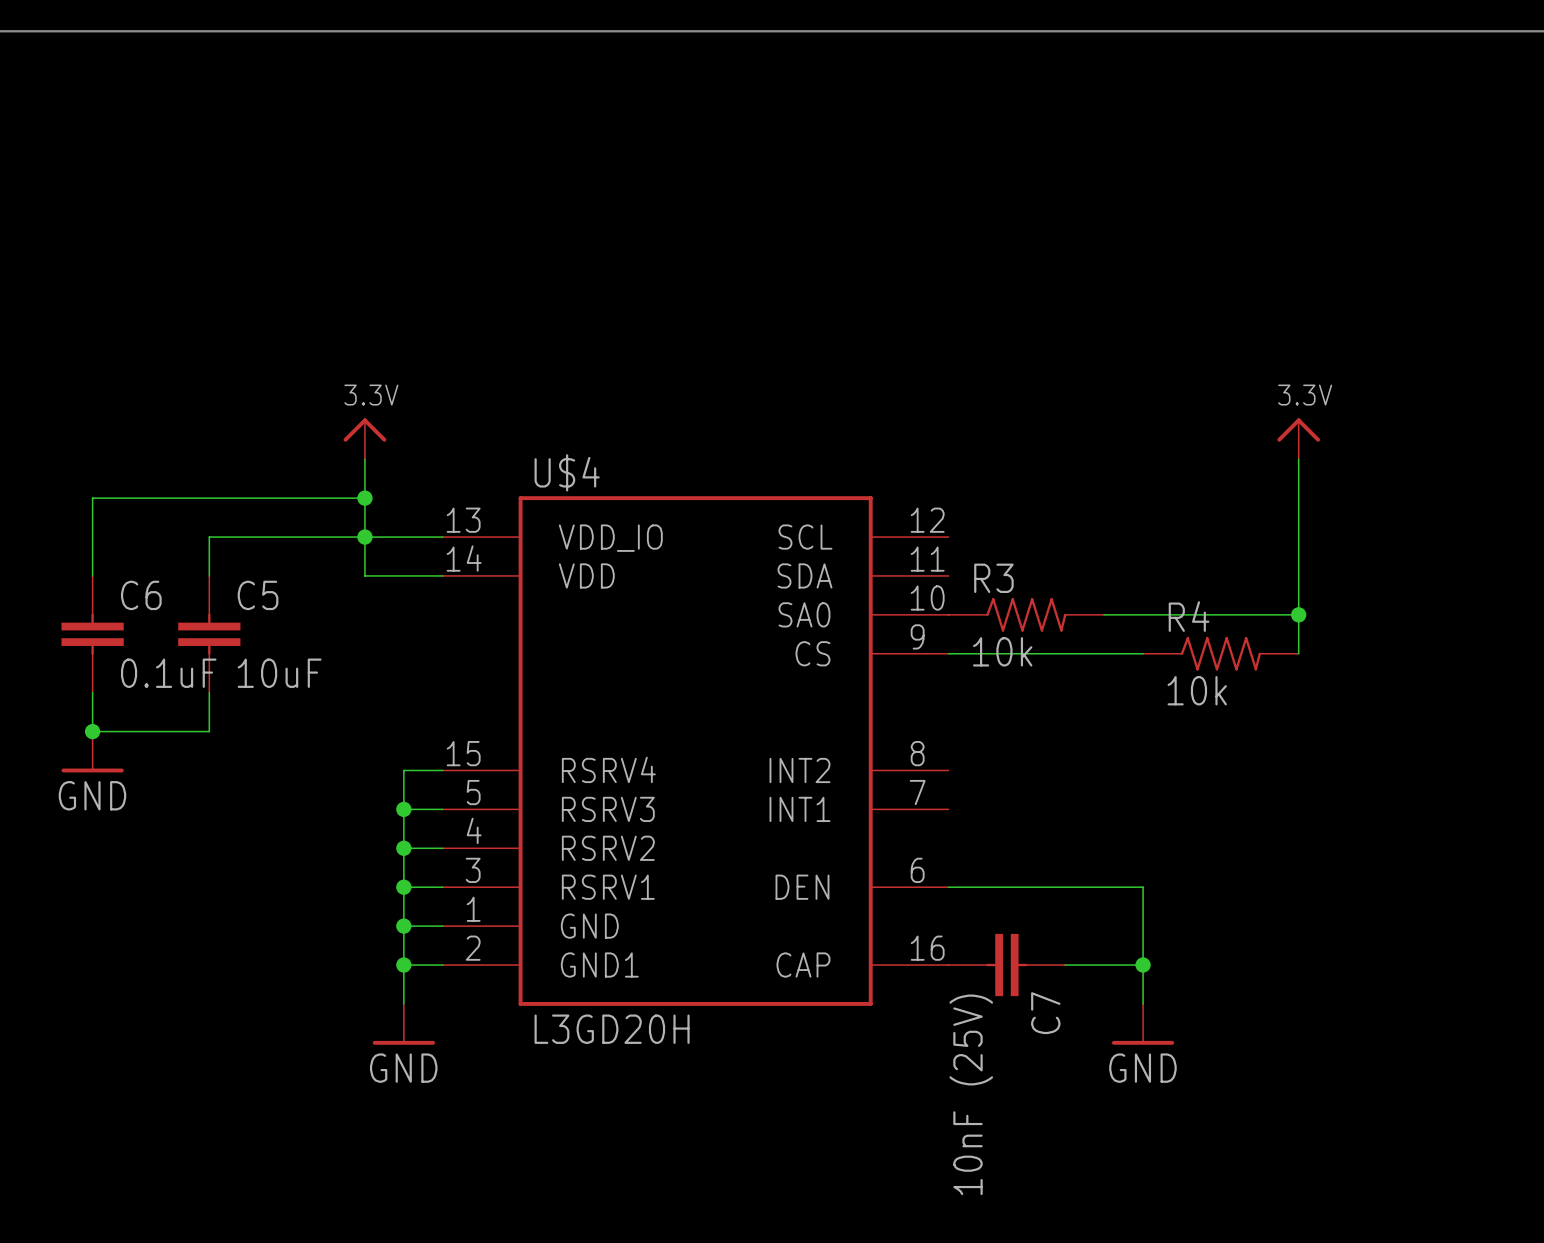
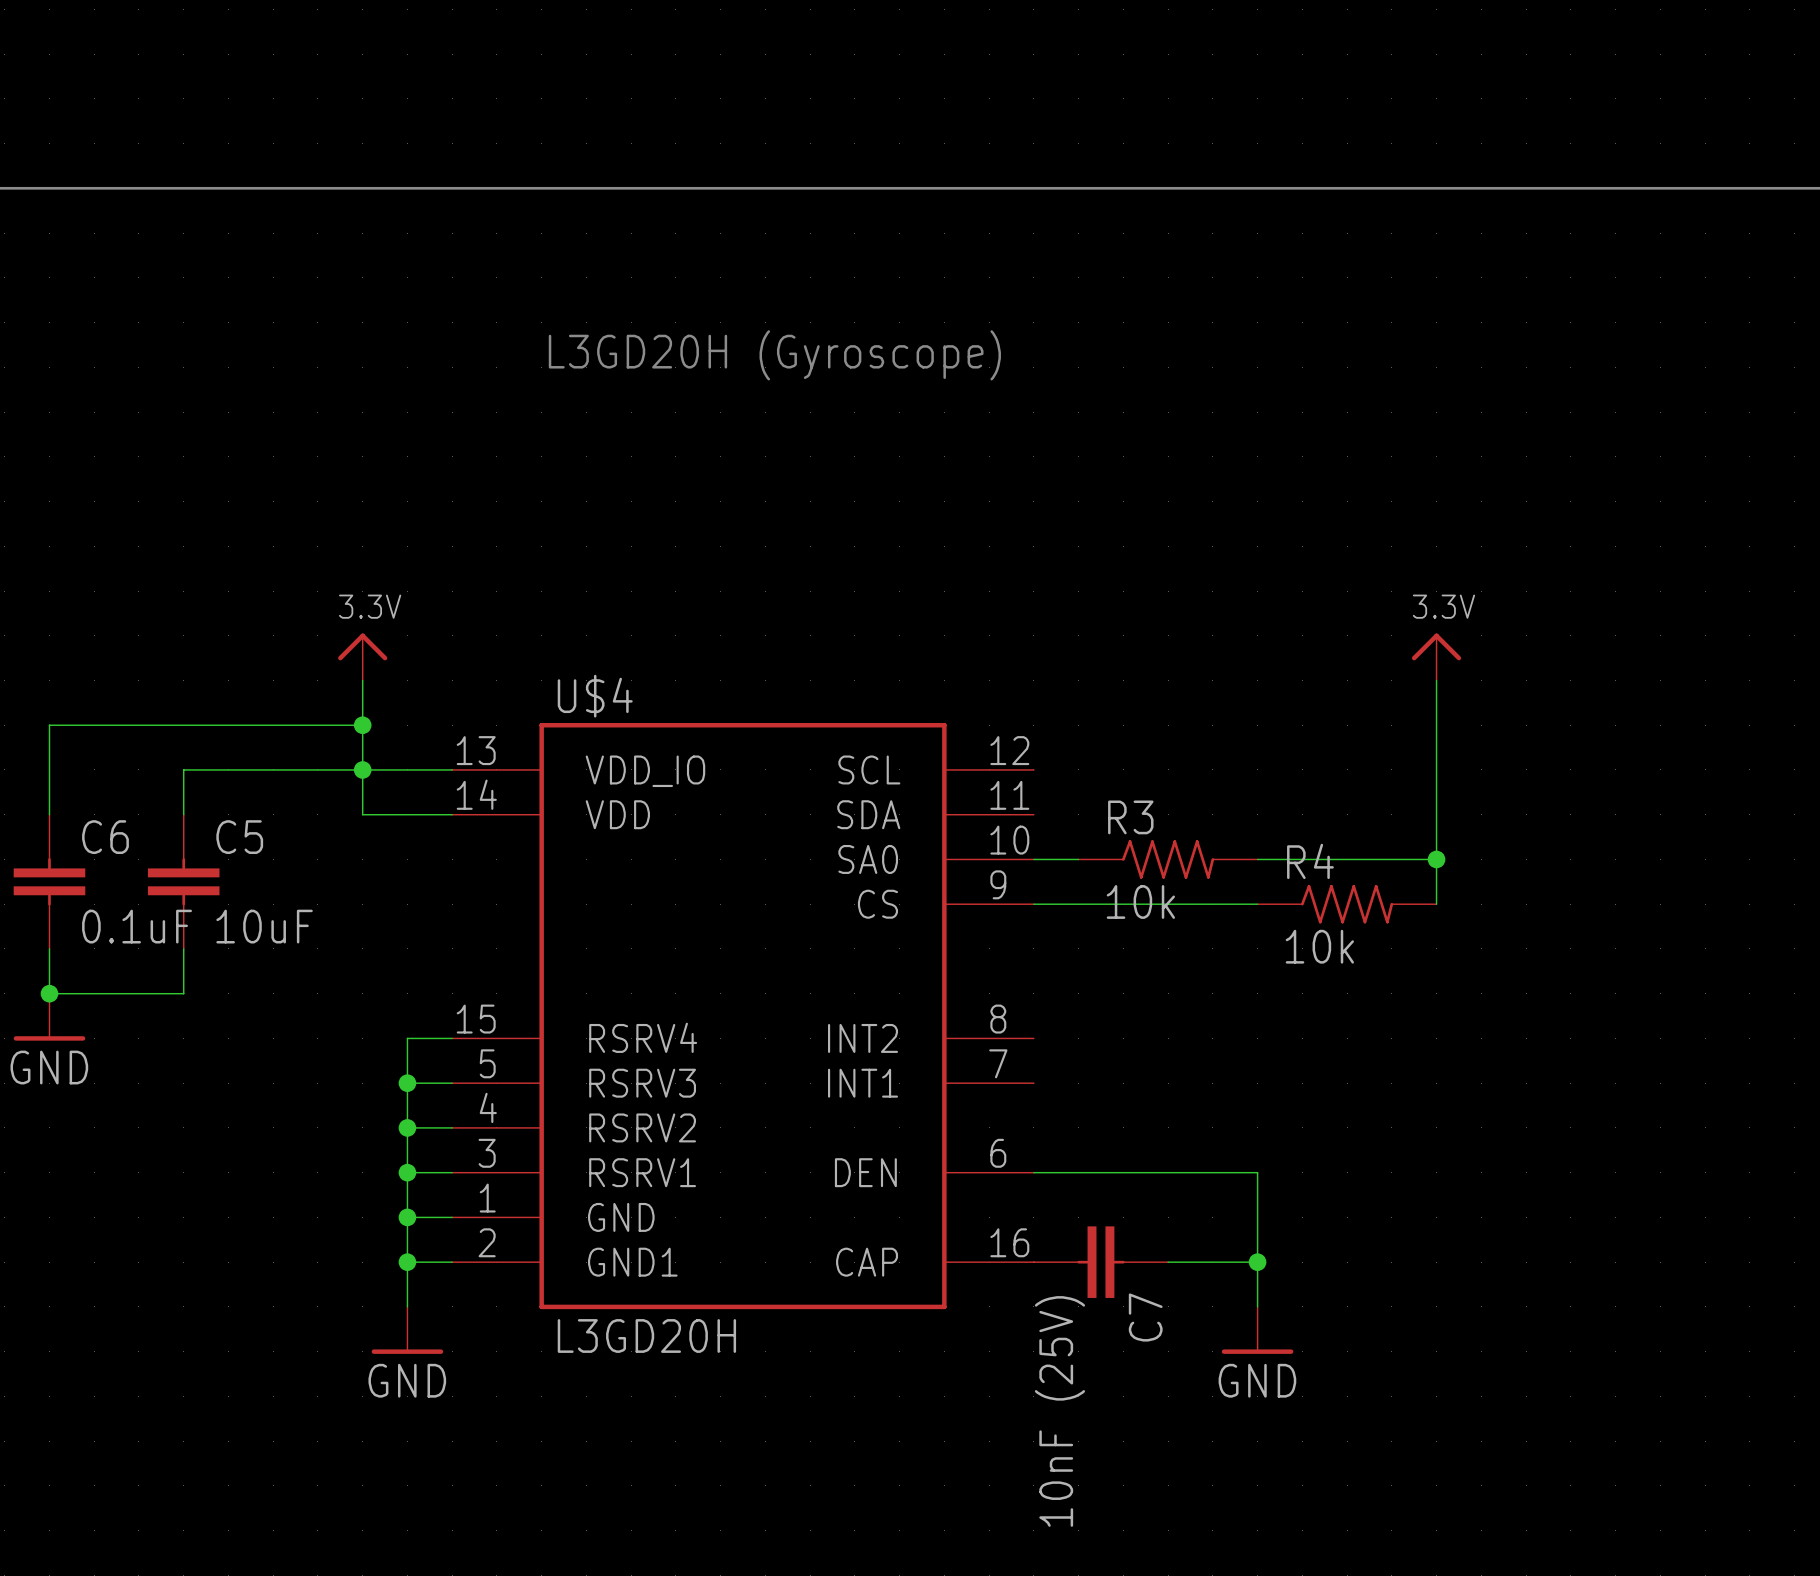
text: none -> L3GD20H (Gyroscope) (774, 355)
R3 position: (1026, 614) -> (1168, 859)

